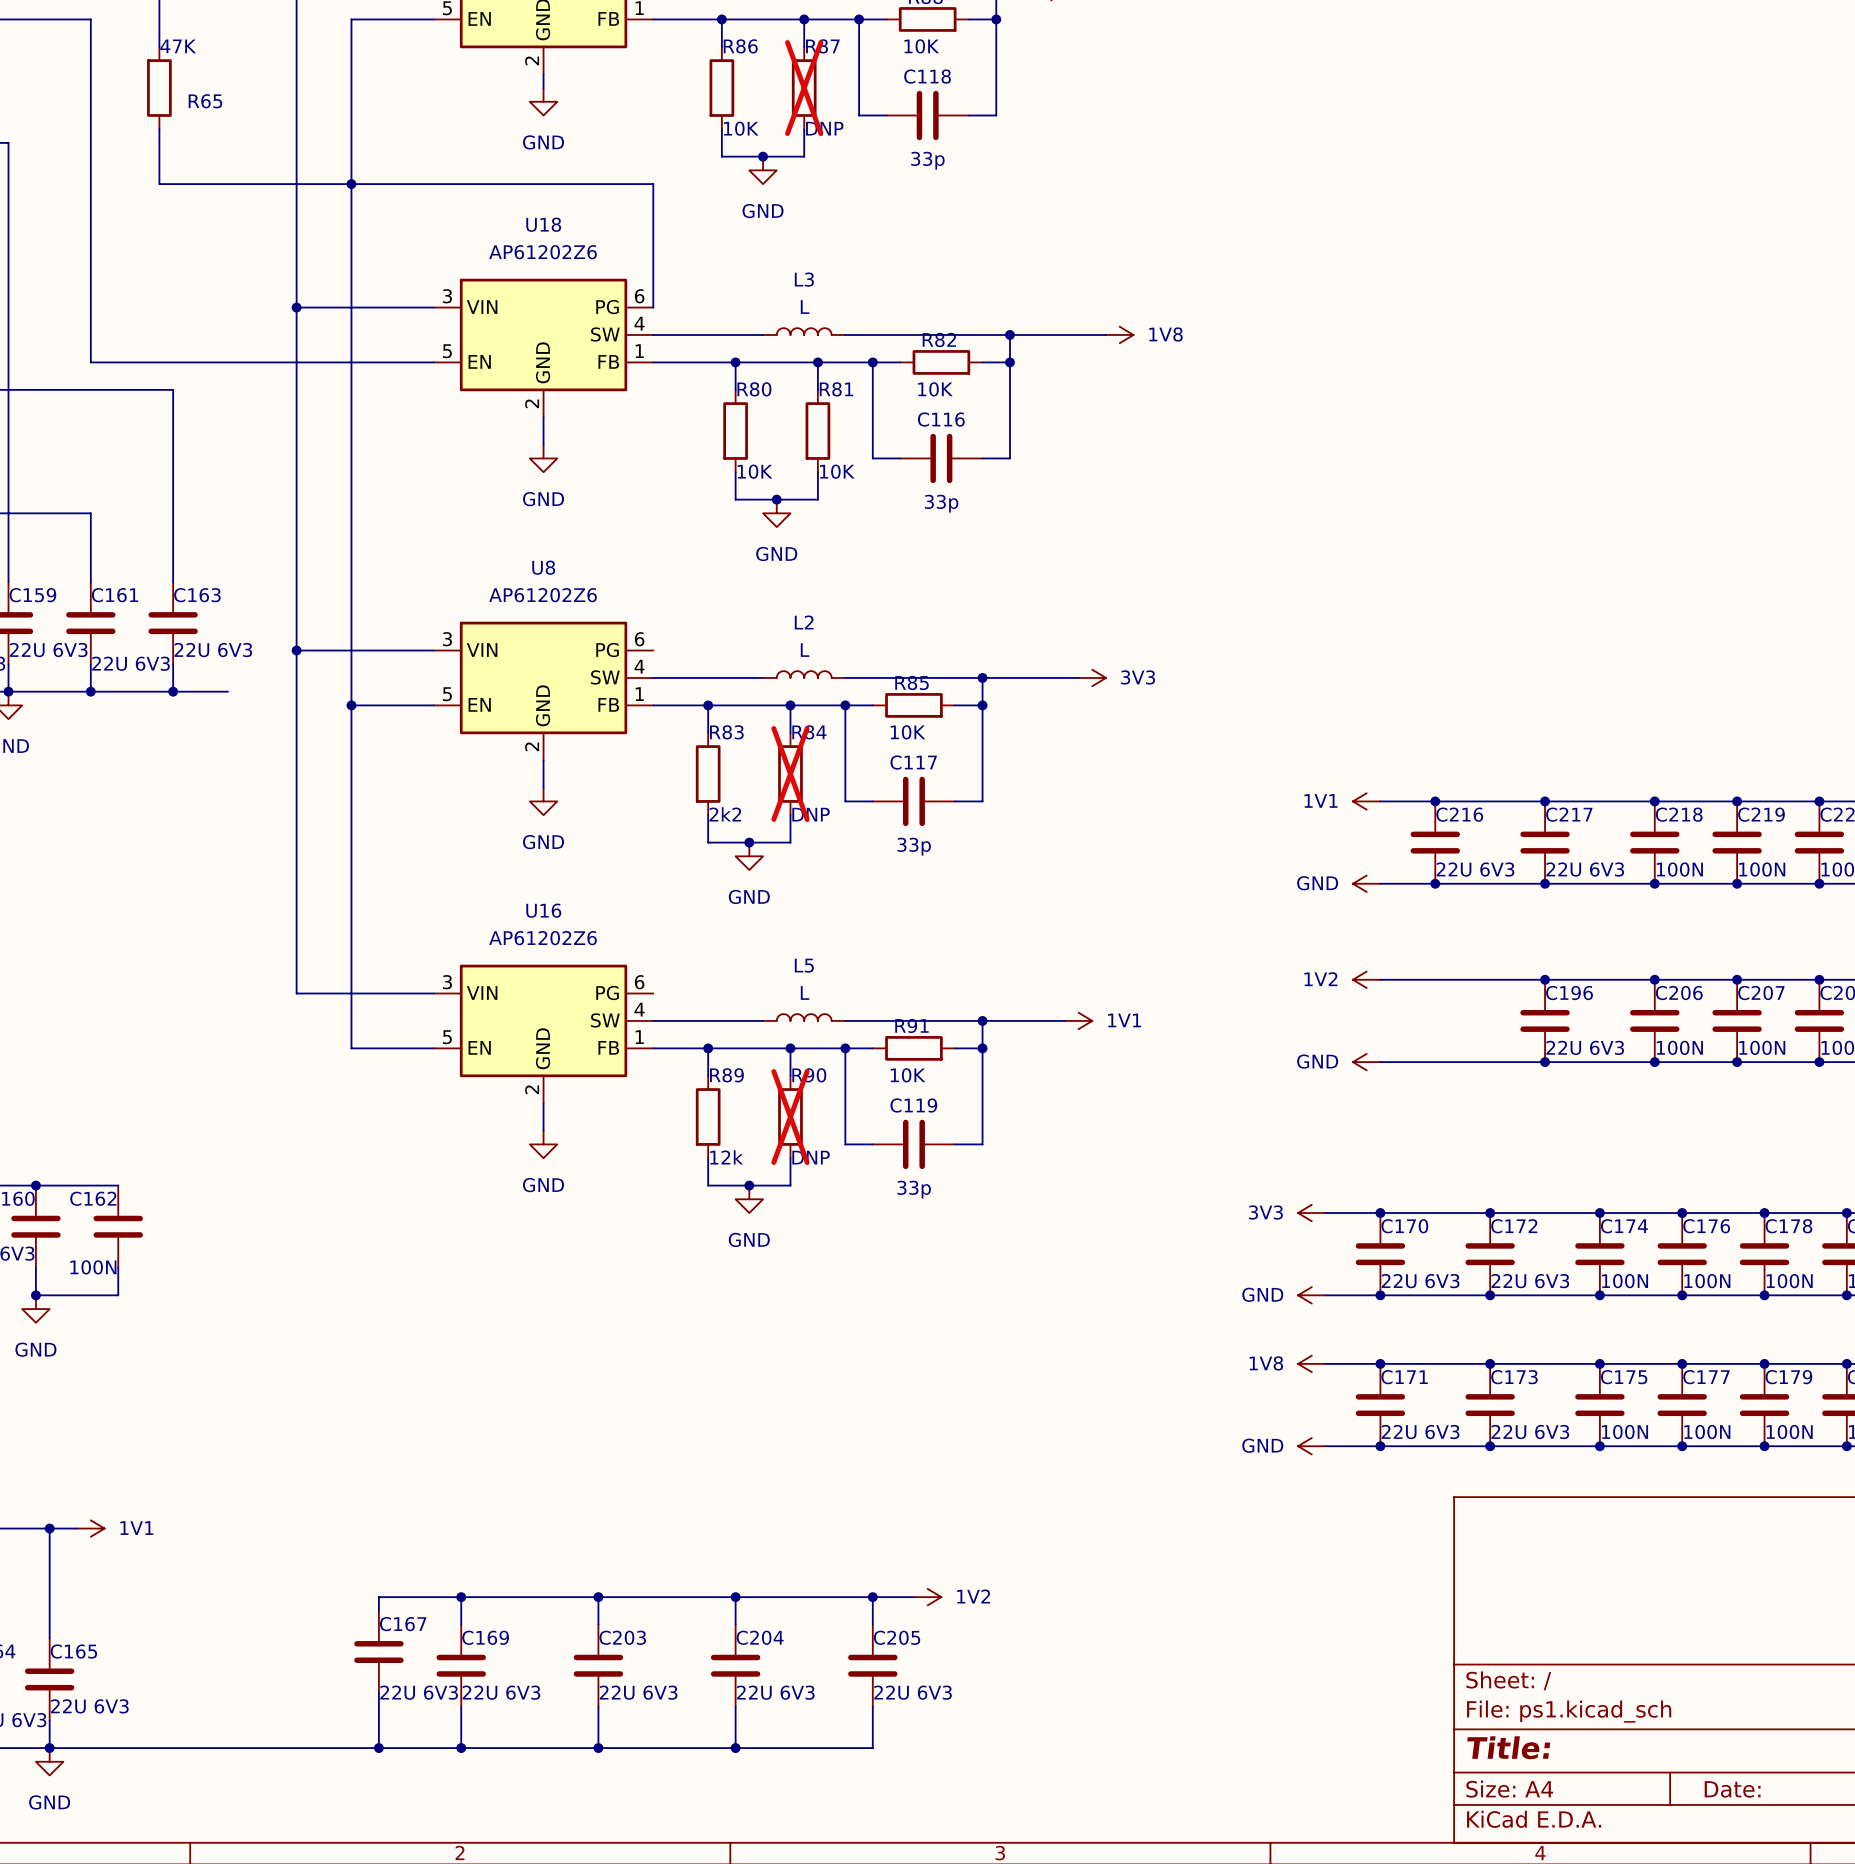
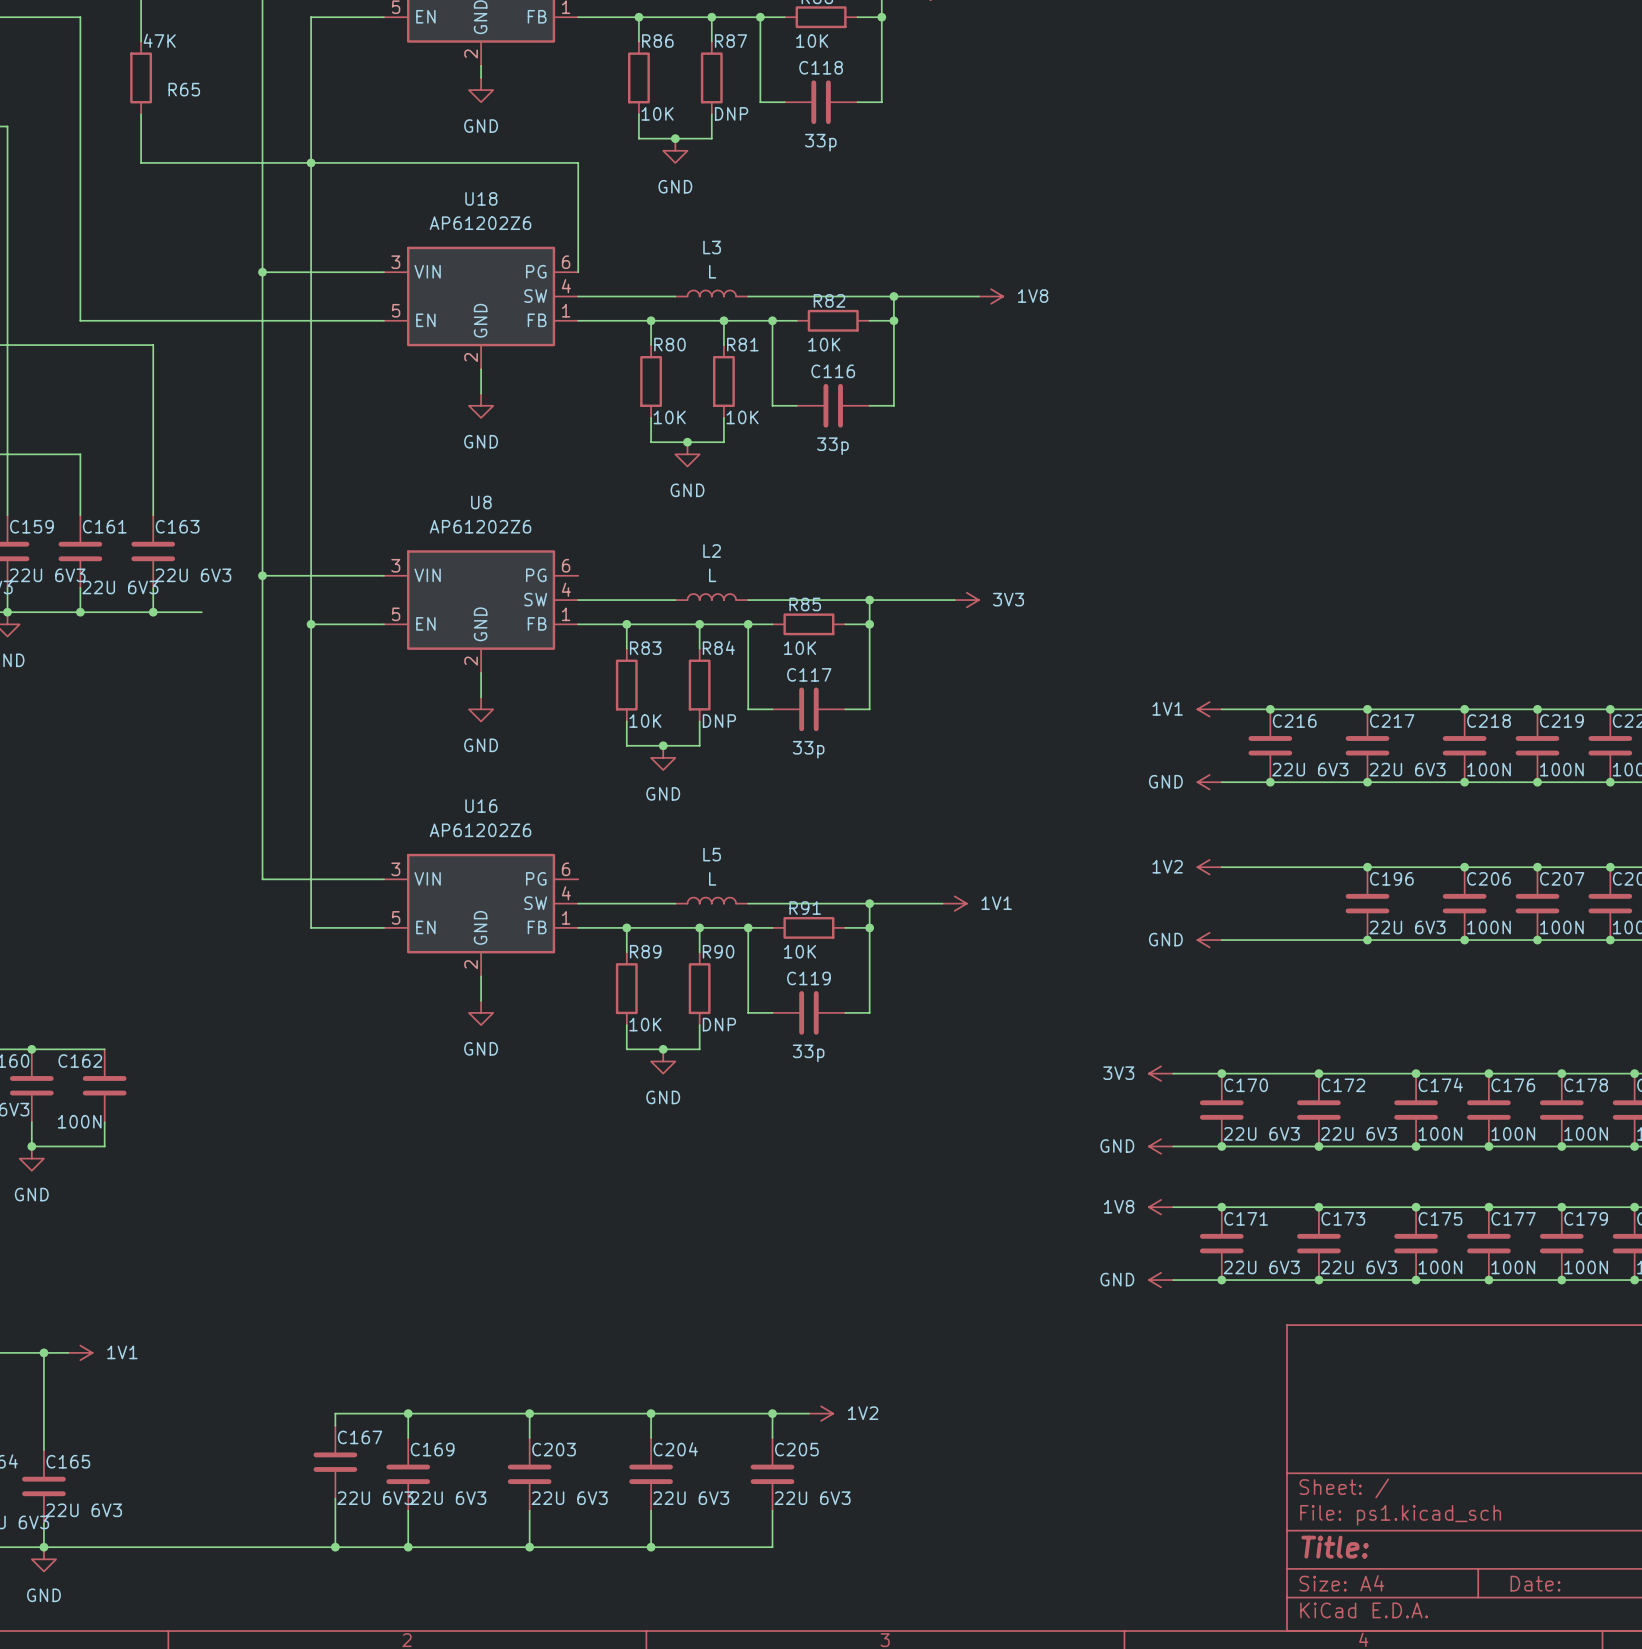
R87 do-not-place cross: (804, 88) -> none
R84 do-not-place cross: (790, 774) -> none
R83 value: 2k2 (725, 814) -> 10K (645, 721)
R90 do-not-place cross: (790, 1116) -> none
R89 value: 12k (726, 1157) -> 10K (645, 1024)

